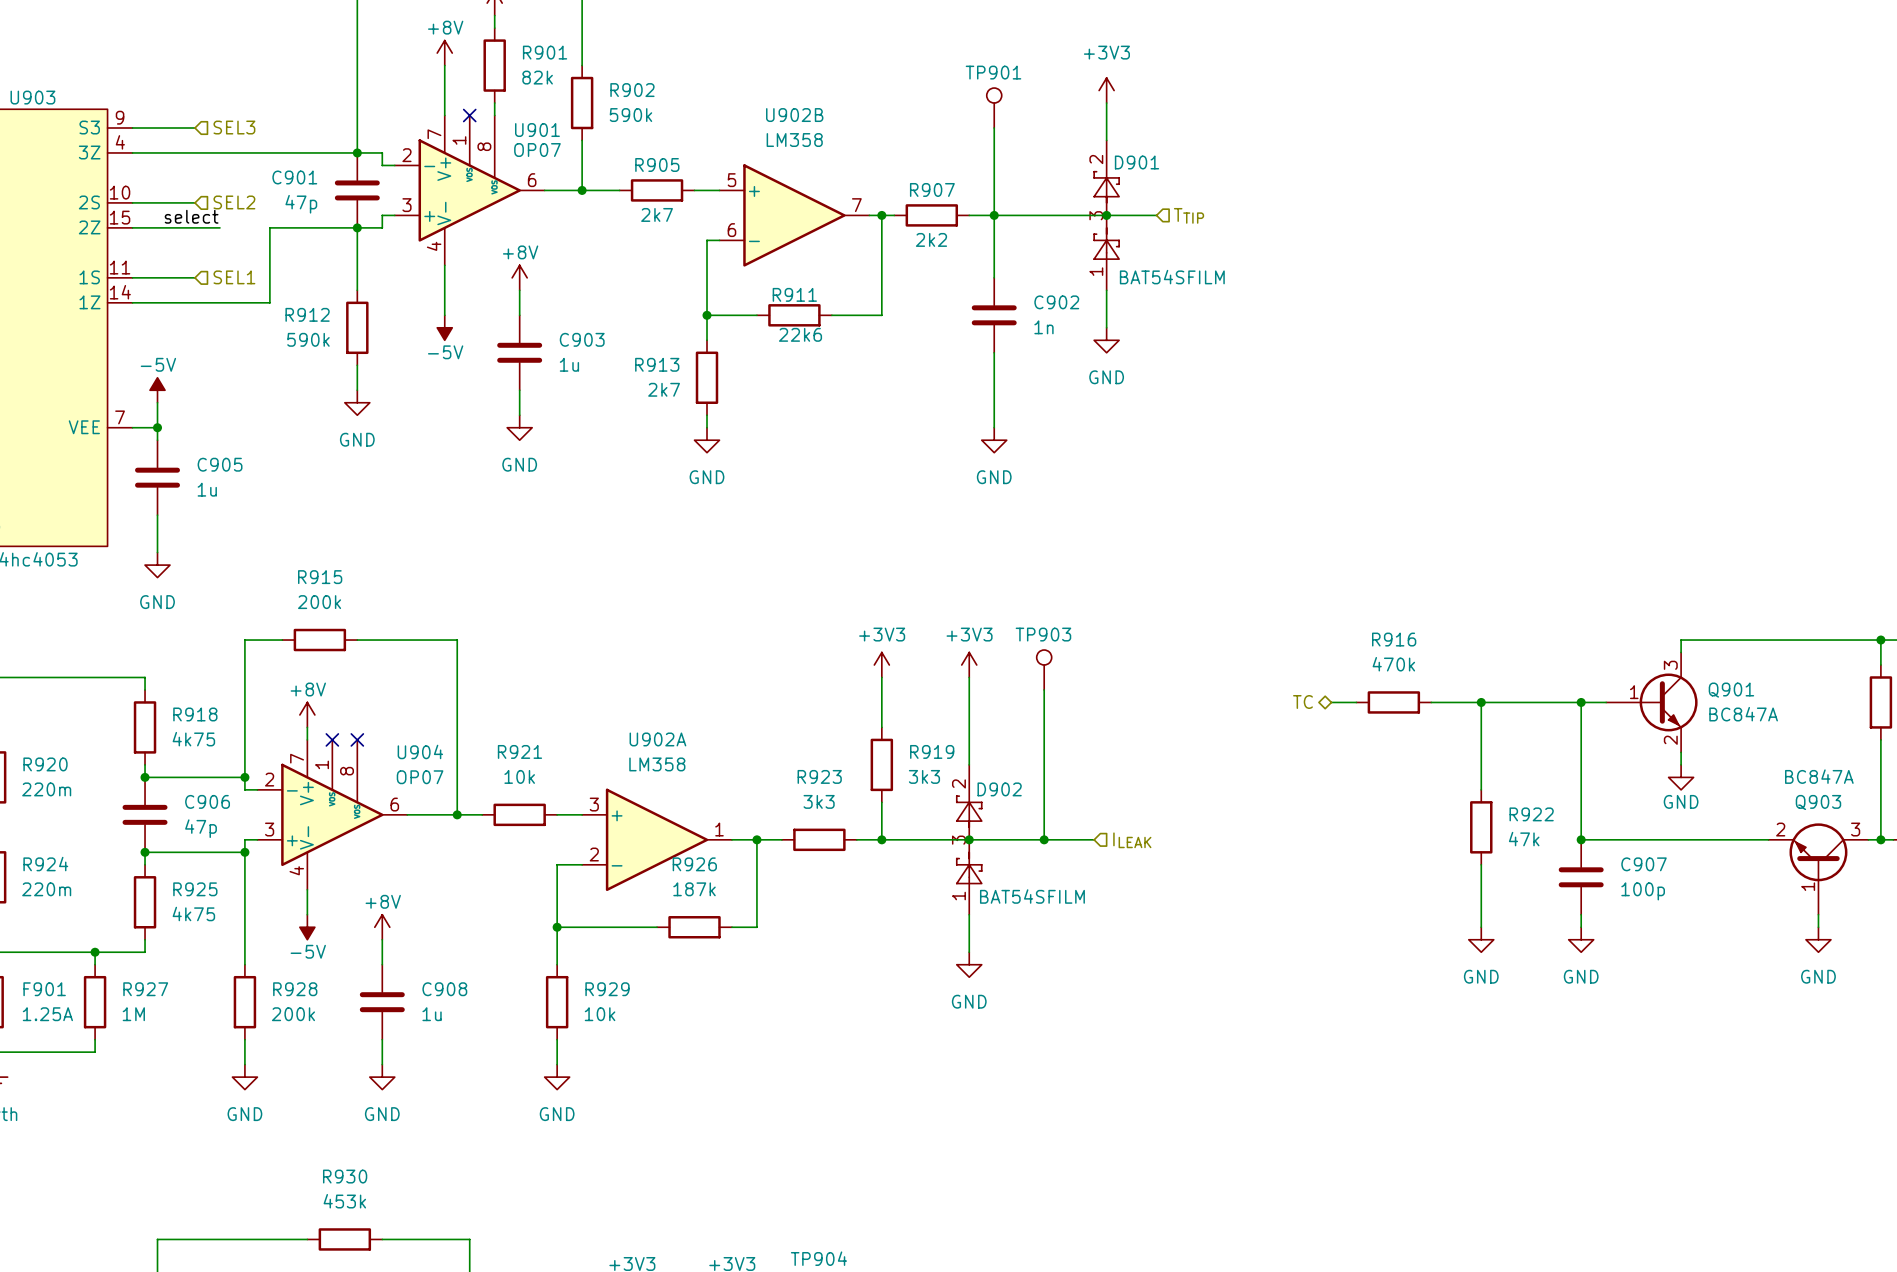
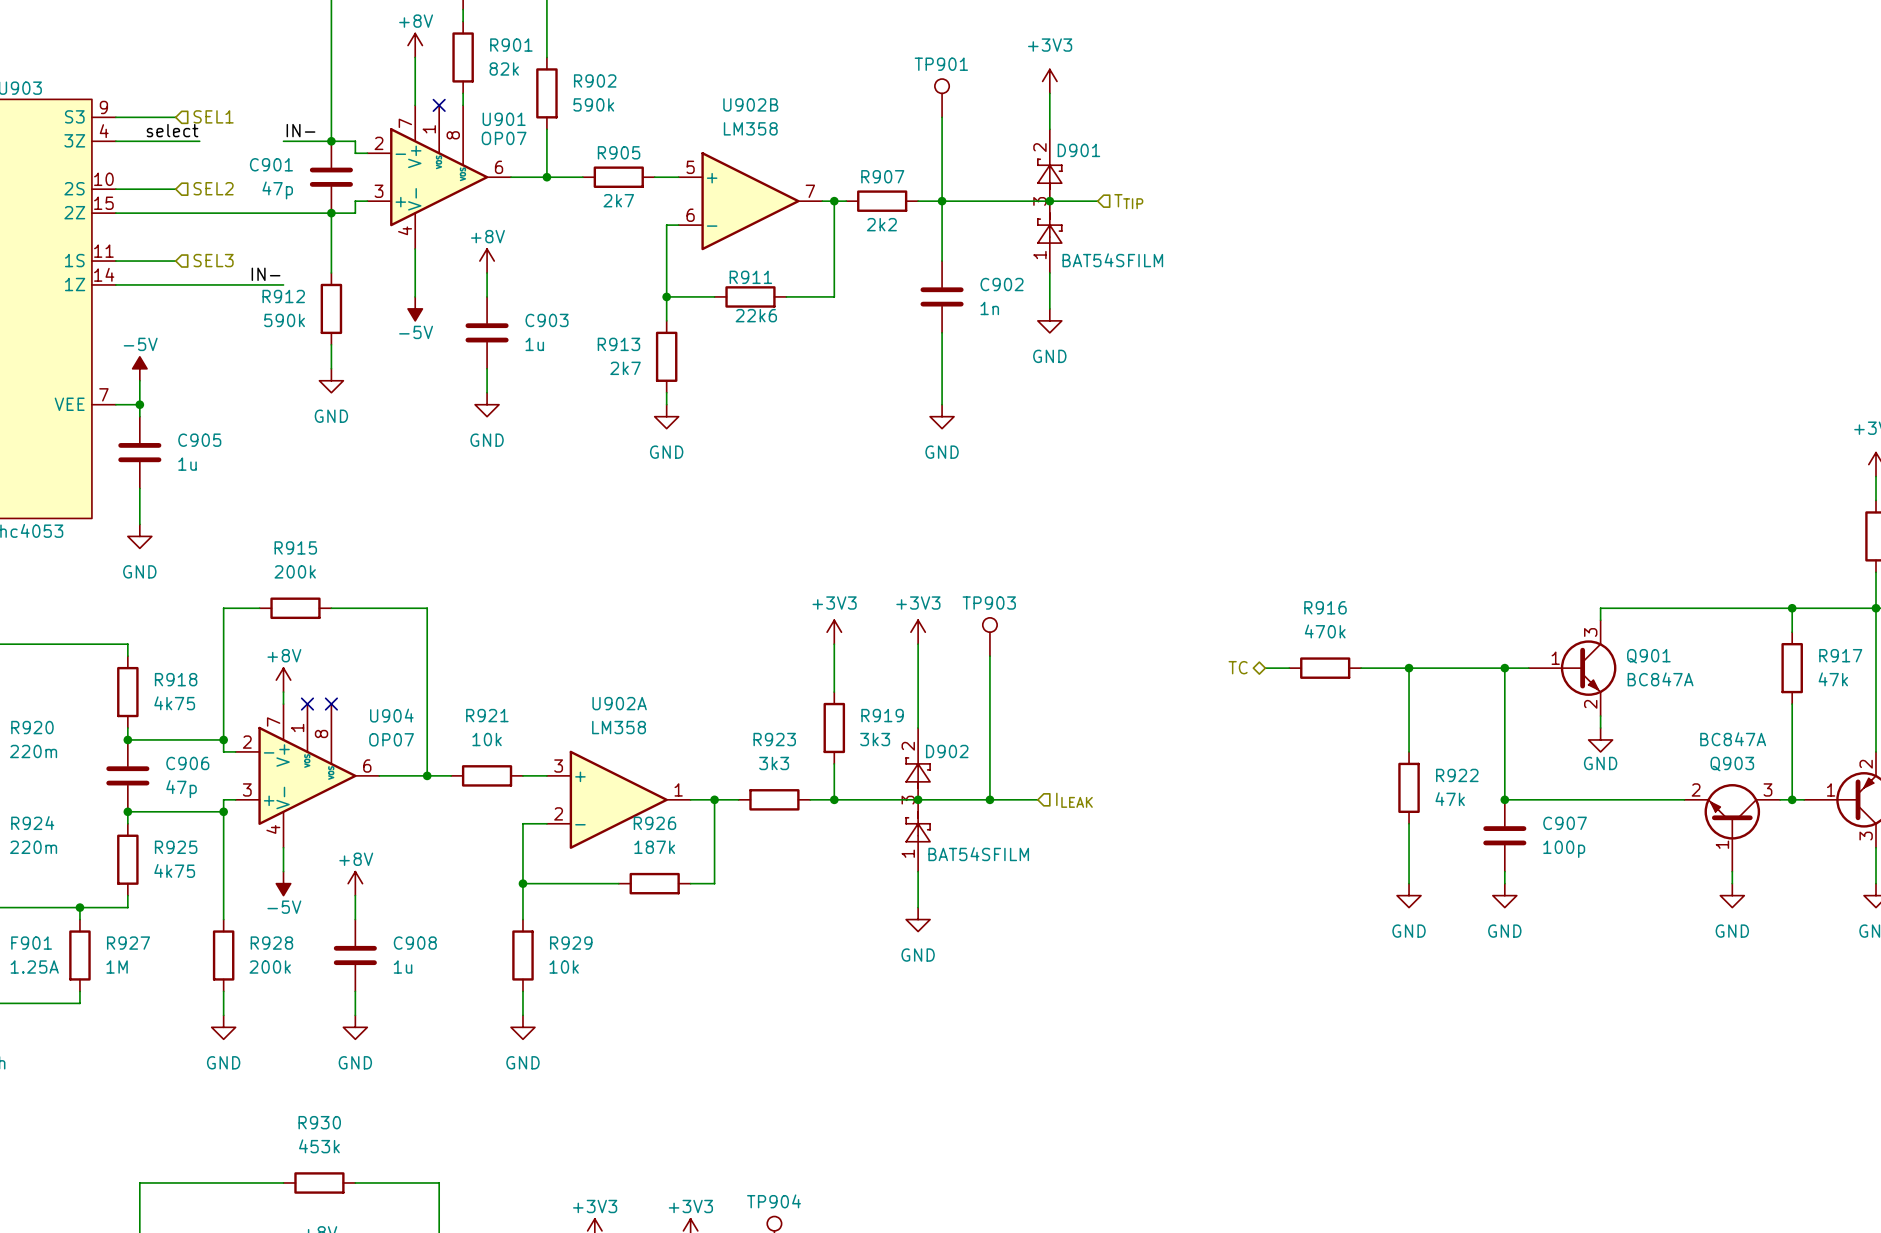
hierarchical label: SEL3 (234, 127) -> SEL1 (213, 116)
label: none -> IN- (300, 130)
wire: (219, 152) (307, 152) -> none
label position: select (191, 216) -> select (172, 130)
wire: none -> (199, 213) (247, 213)
wire: (269, 227) (269, 302) -> (283, 284) (247, 284)
hierarchical label: SEL1 (234, 277) -> SEL3 (213, 260)
label: none -> IN- (266, 274)

